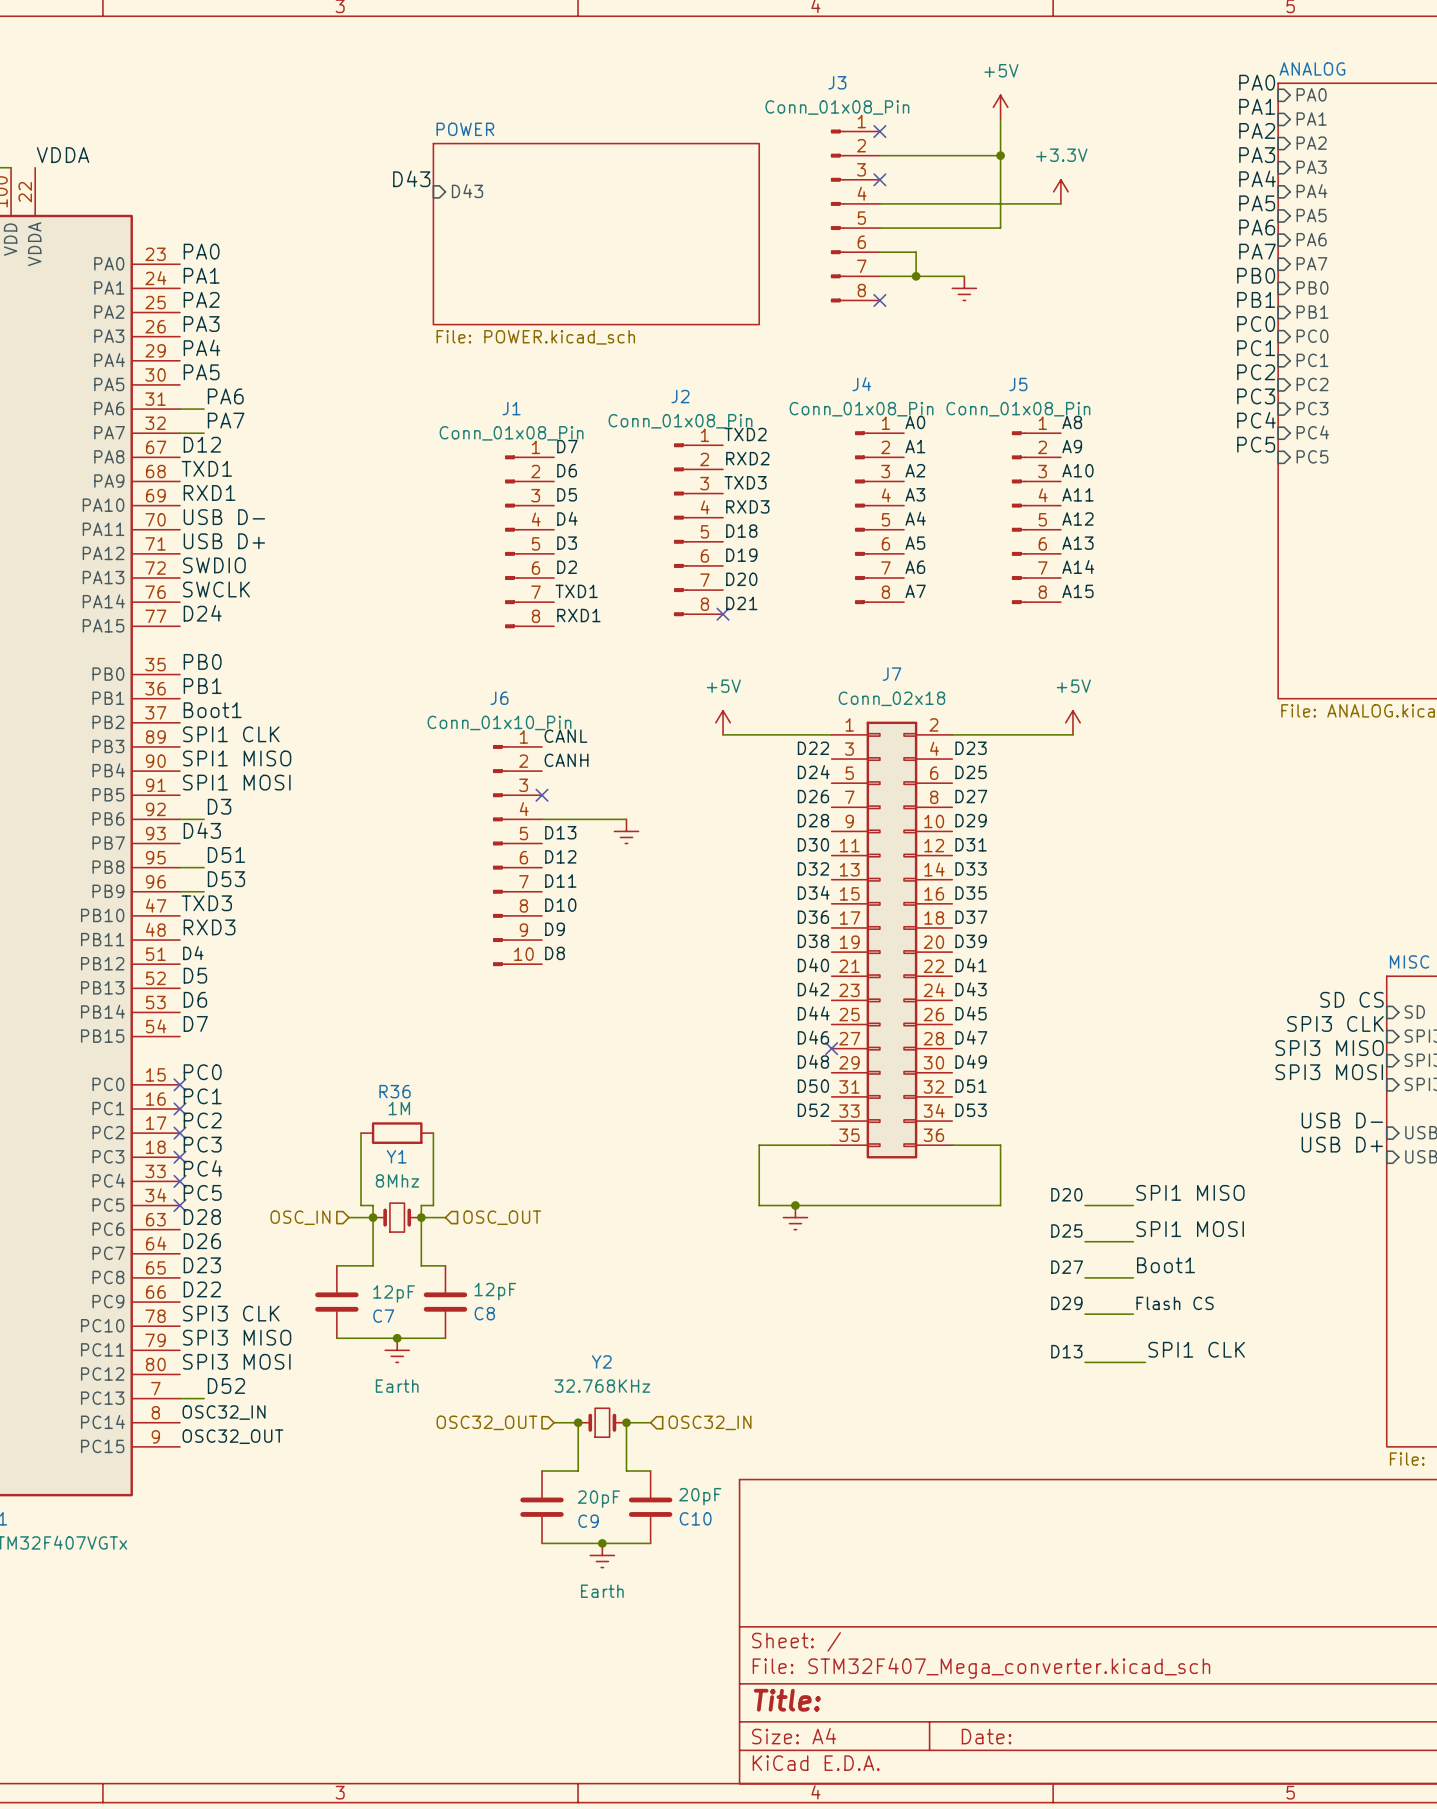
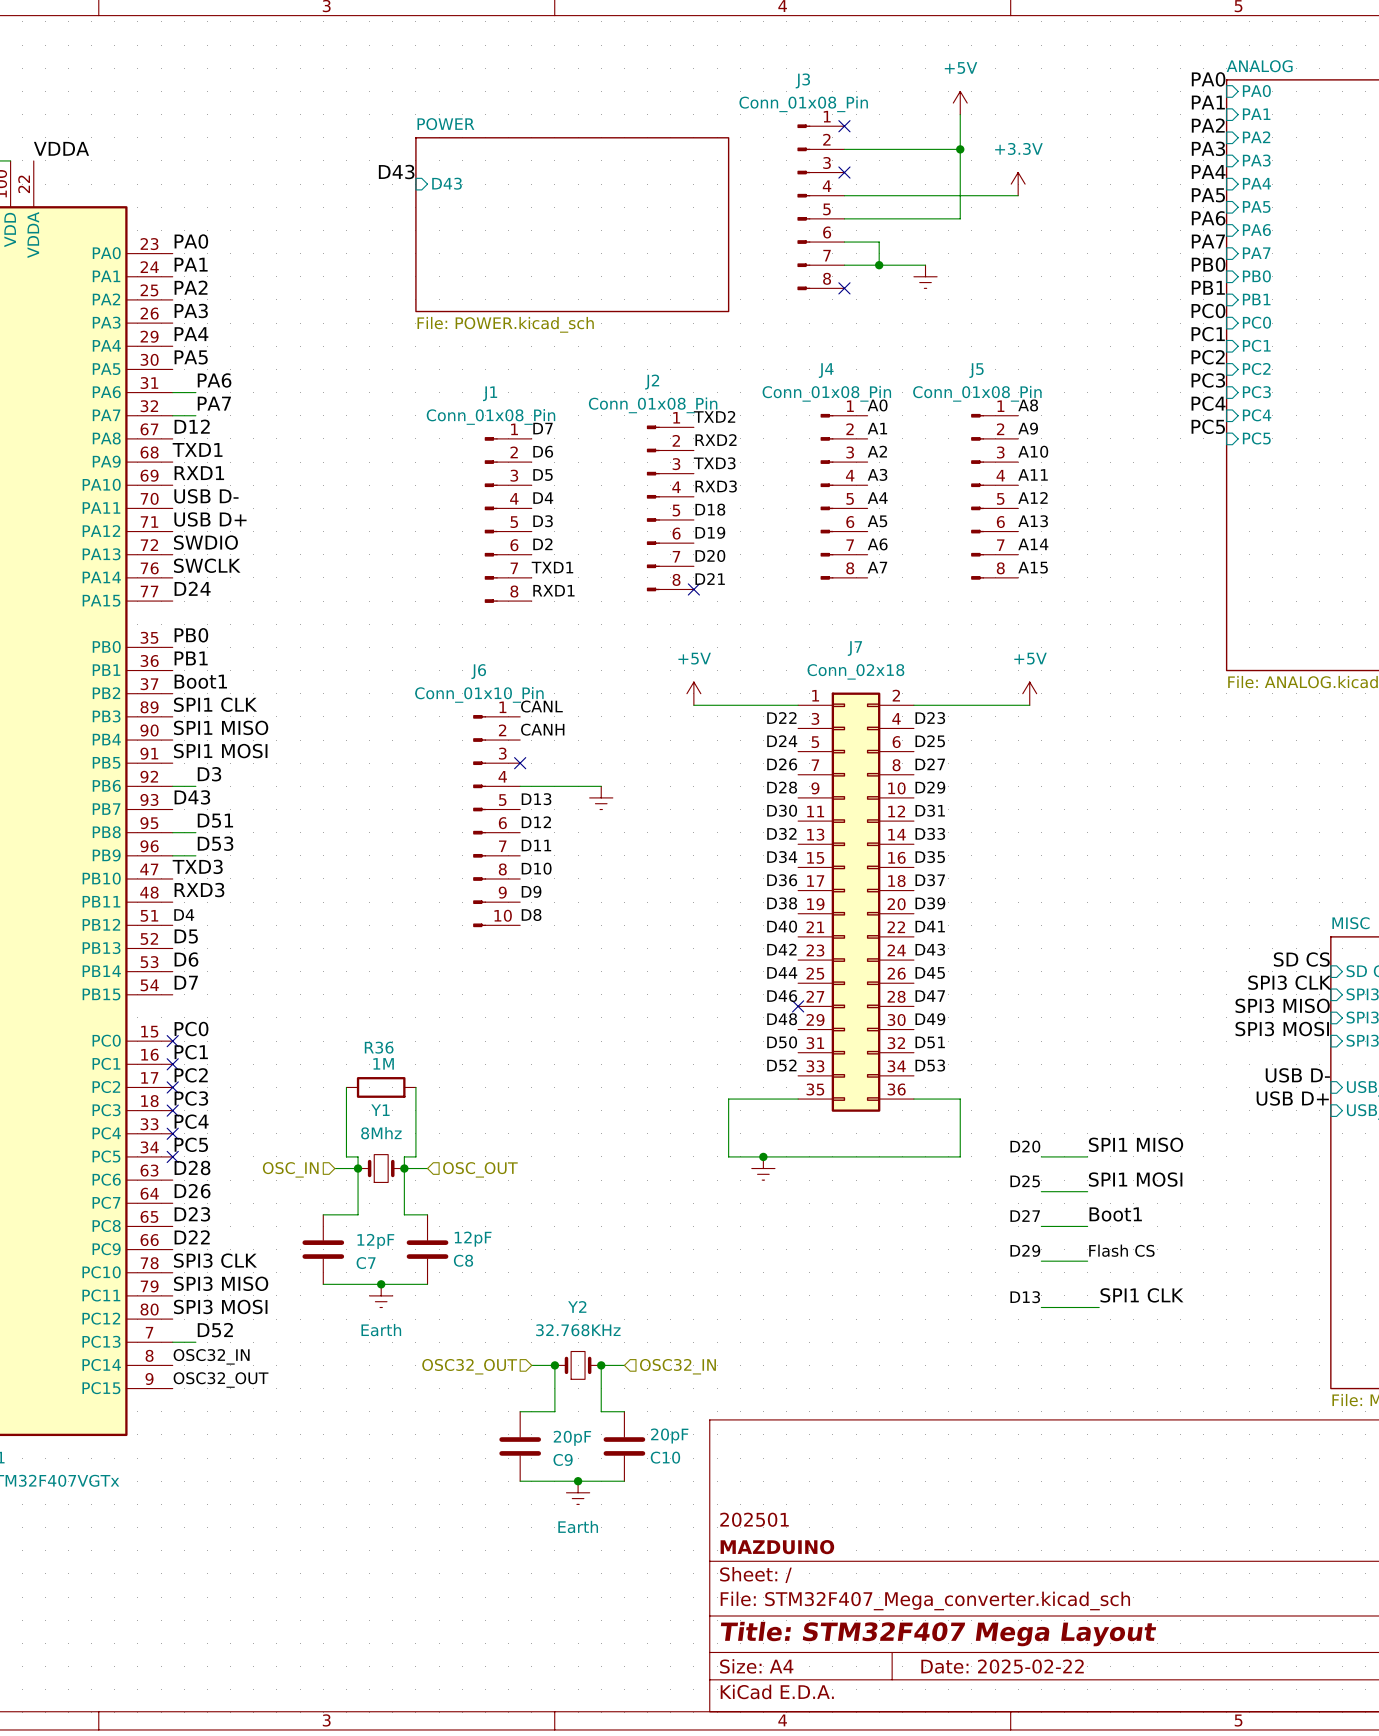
title block: none -> 202501 (754, 1519)
title block: none -> MAZDUINO (777, 1547)
title block: Title: (787, 1700) -> Title: STM32F407 Mega Layout (938, 1634)
title block: Date: (986, 1736) -> Date: 2025-02-22 (1002, 1666)

